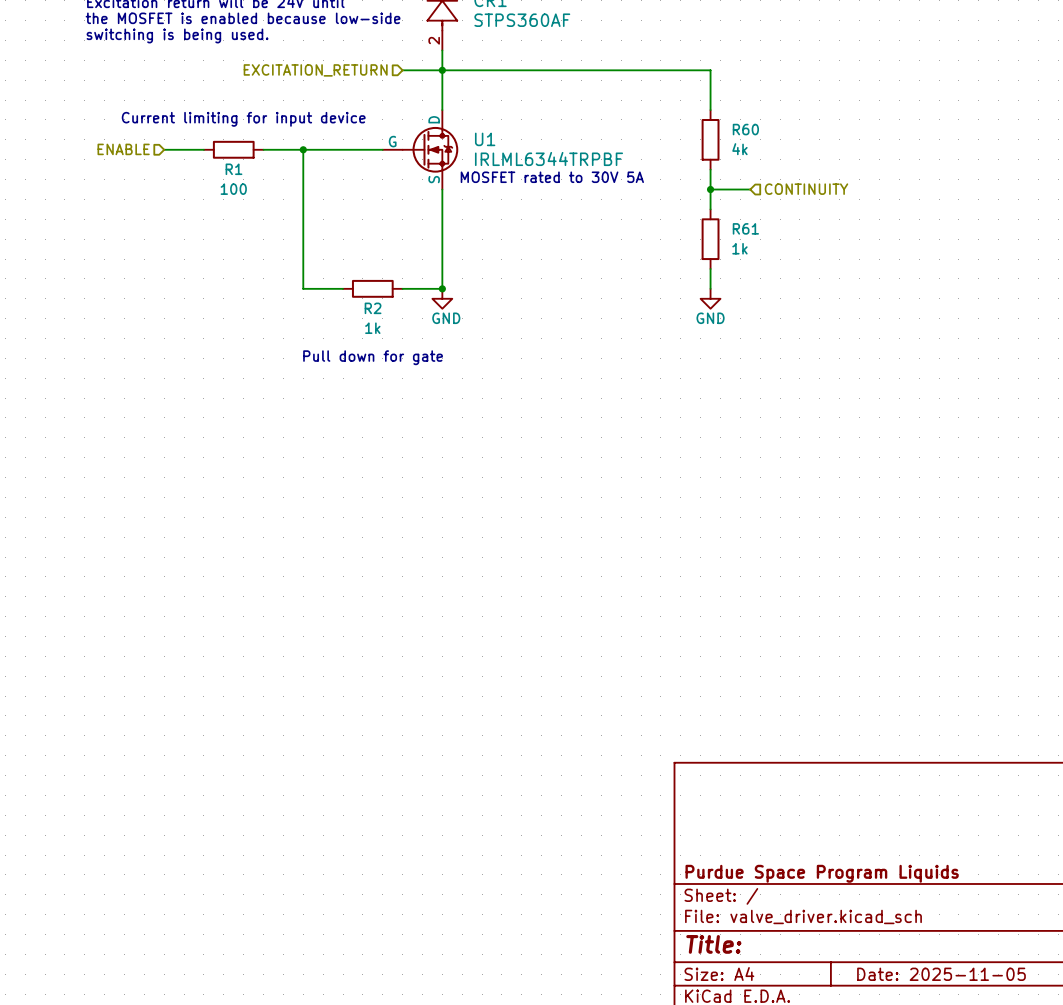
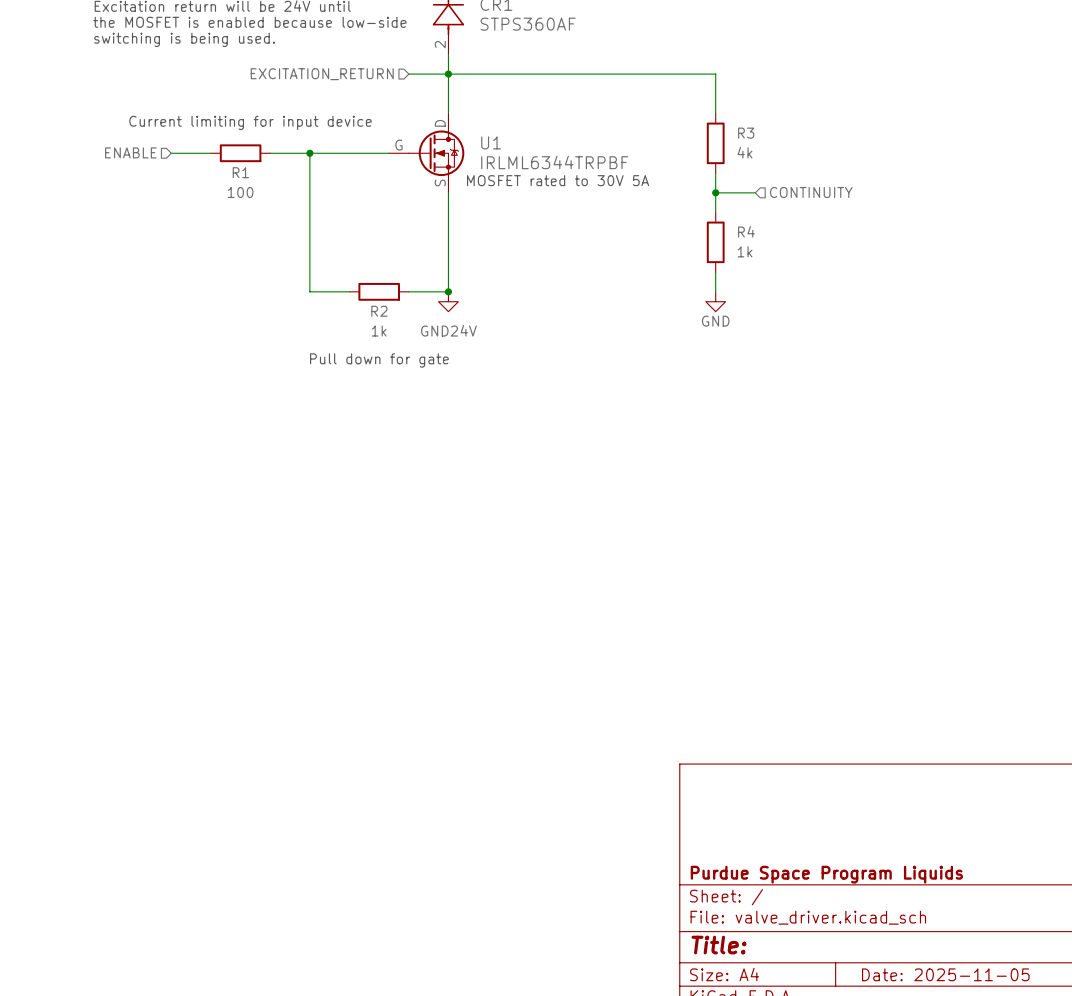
R60 name: R60 (745, 129) -> R3 (746, 133)
R61 name: R61 (745, 228) -> R4 (746, 231)
power symbol: GND (442, 298) -> GND24V (448, 301)

